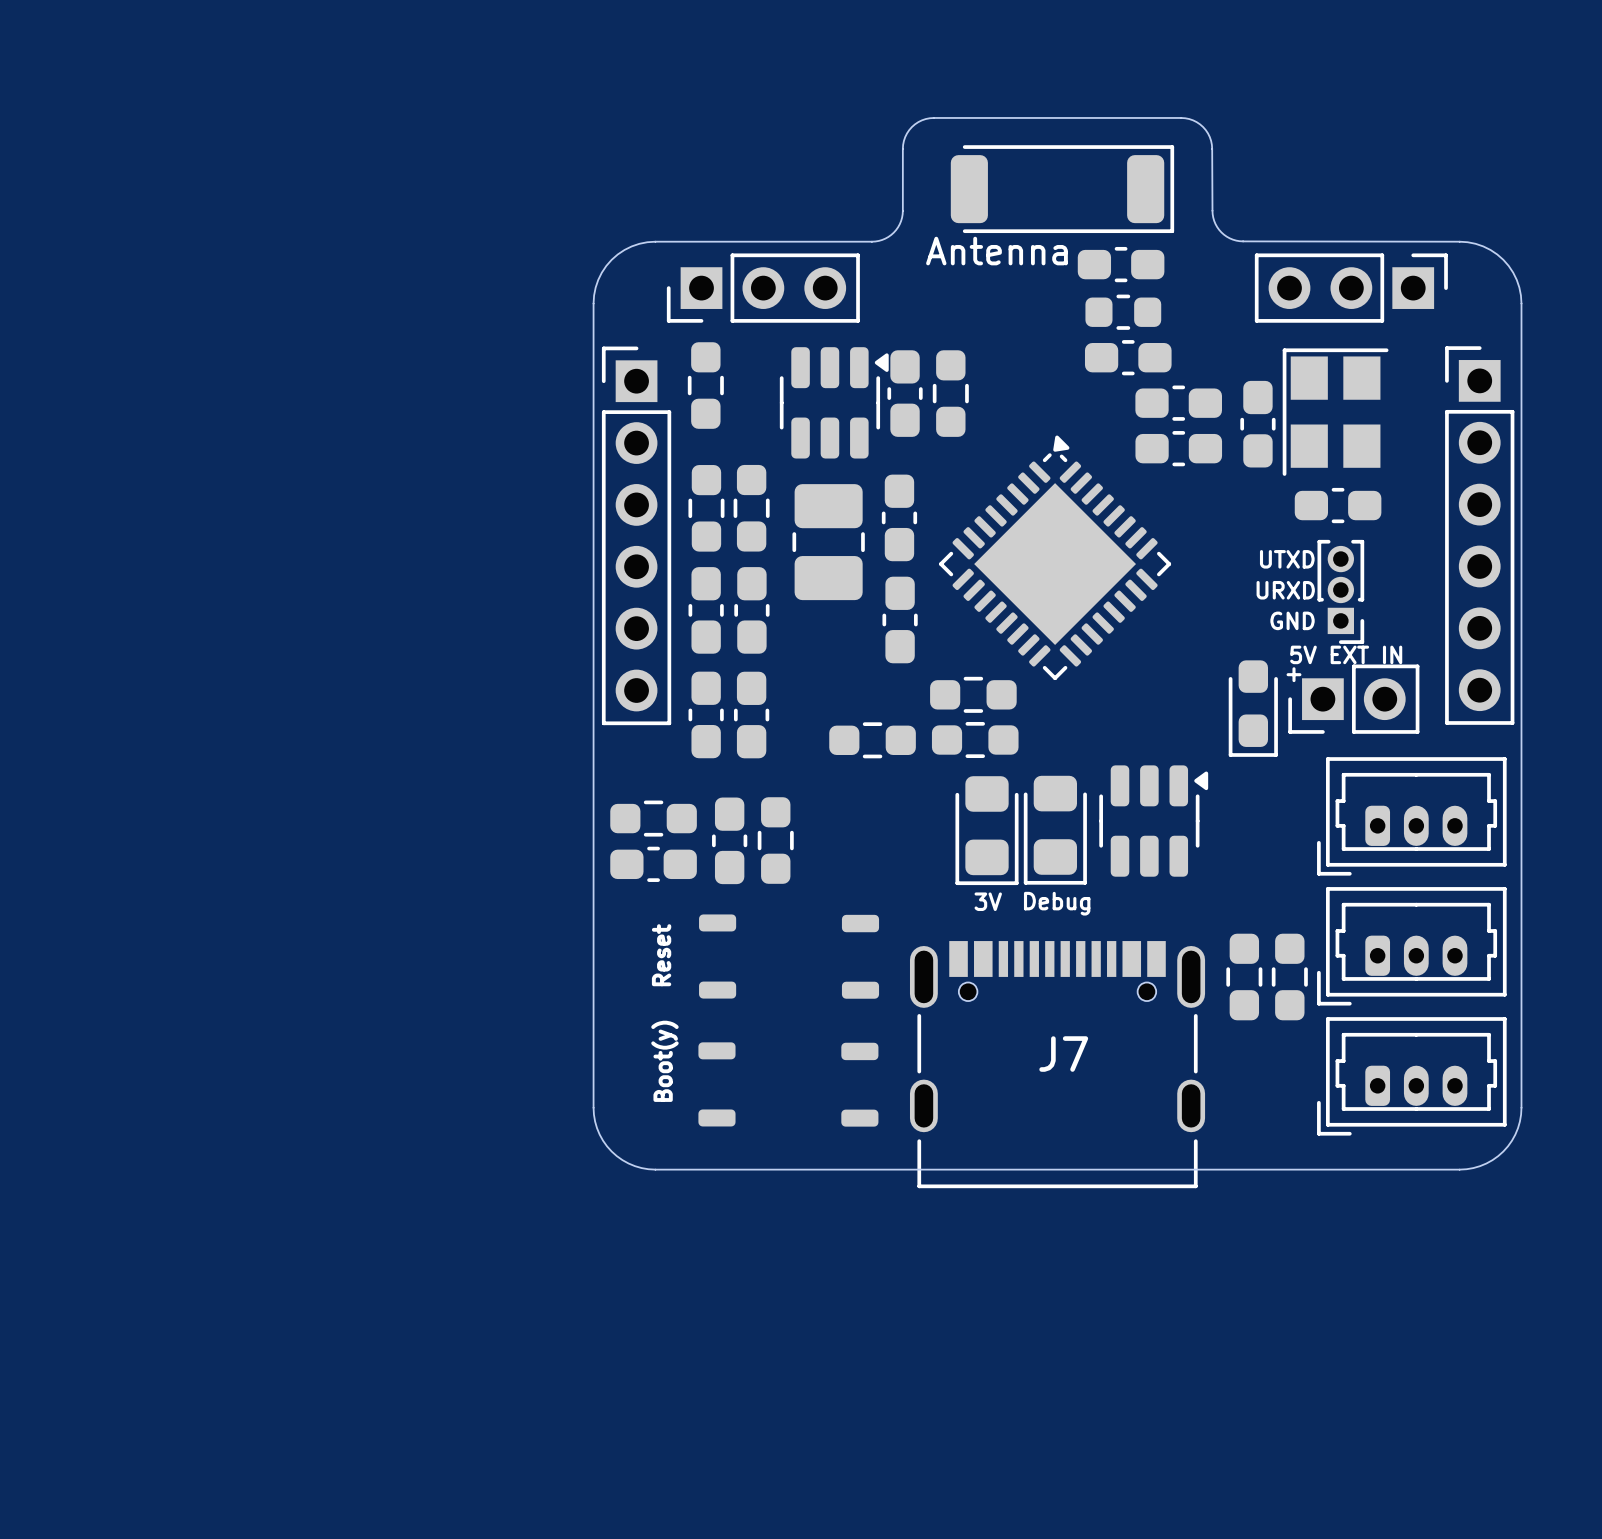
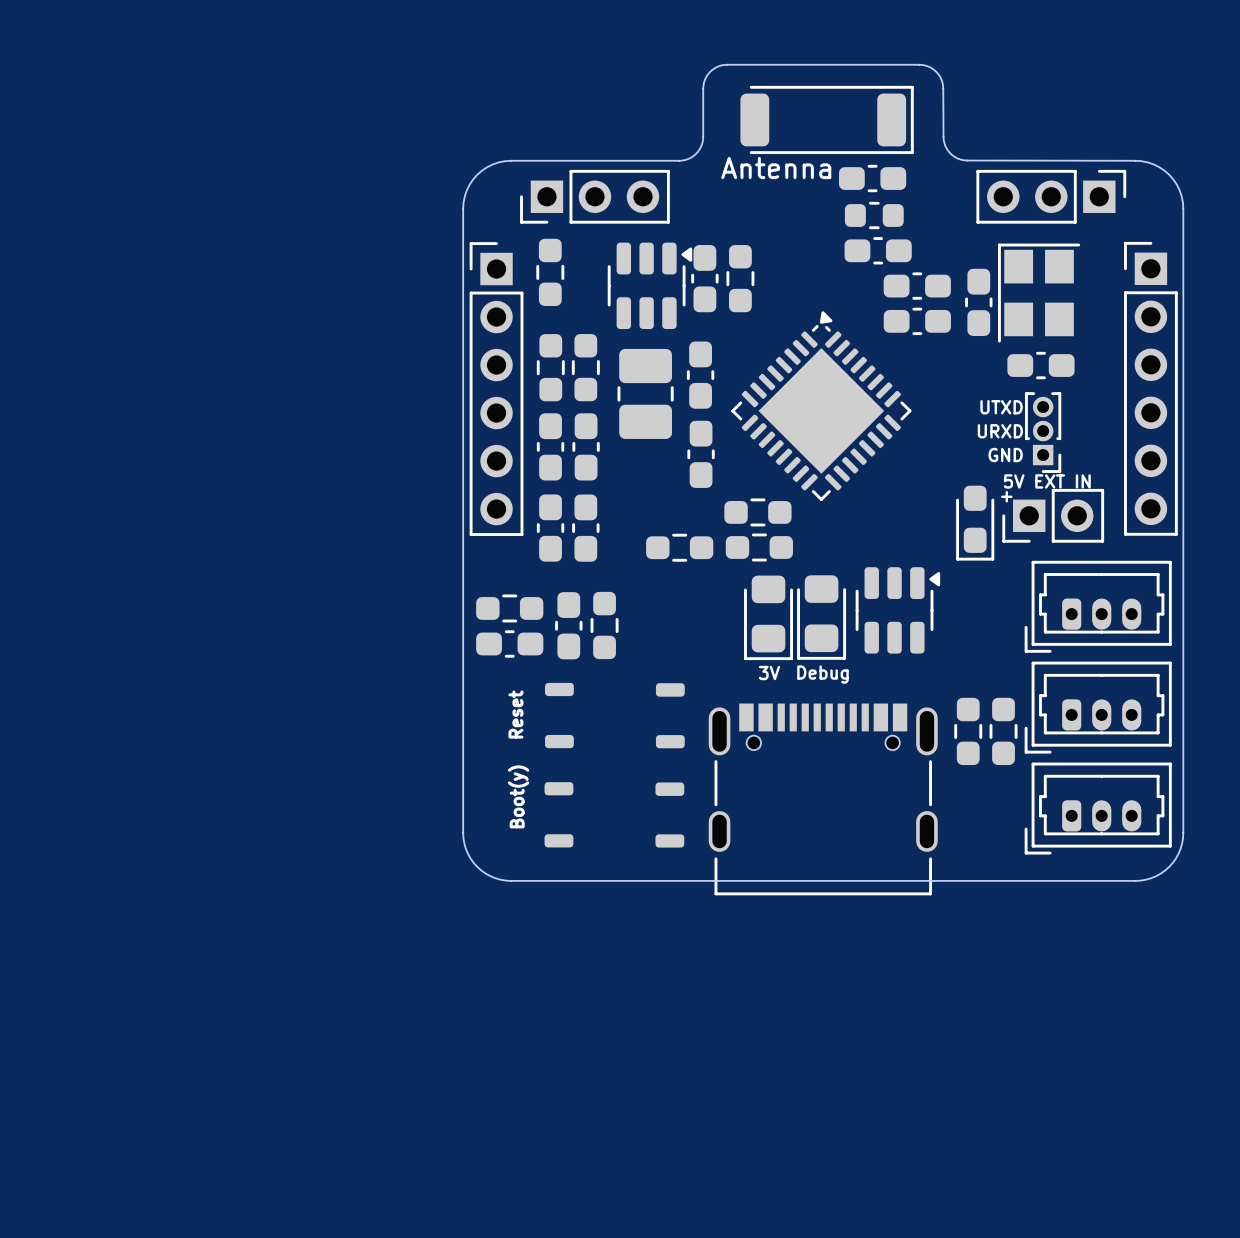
J7 name: J7 (1063, 1054) -> none

